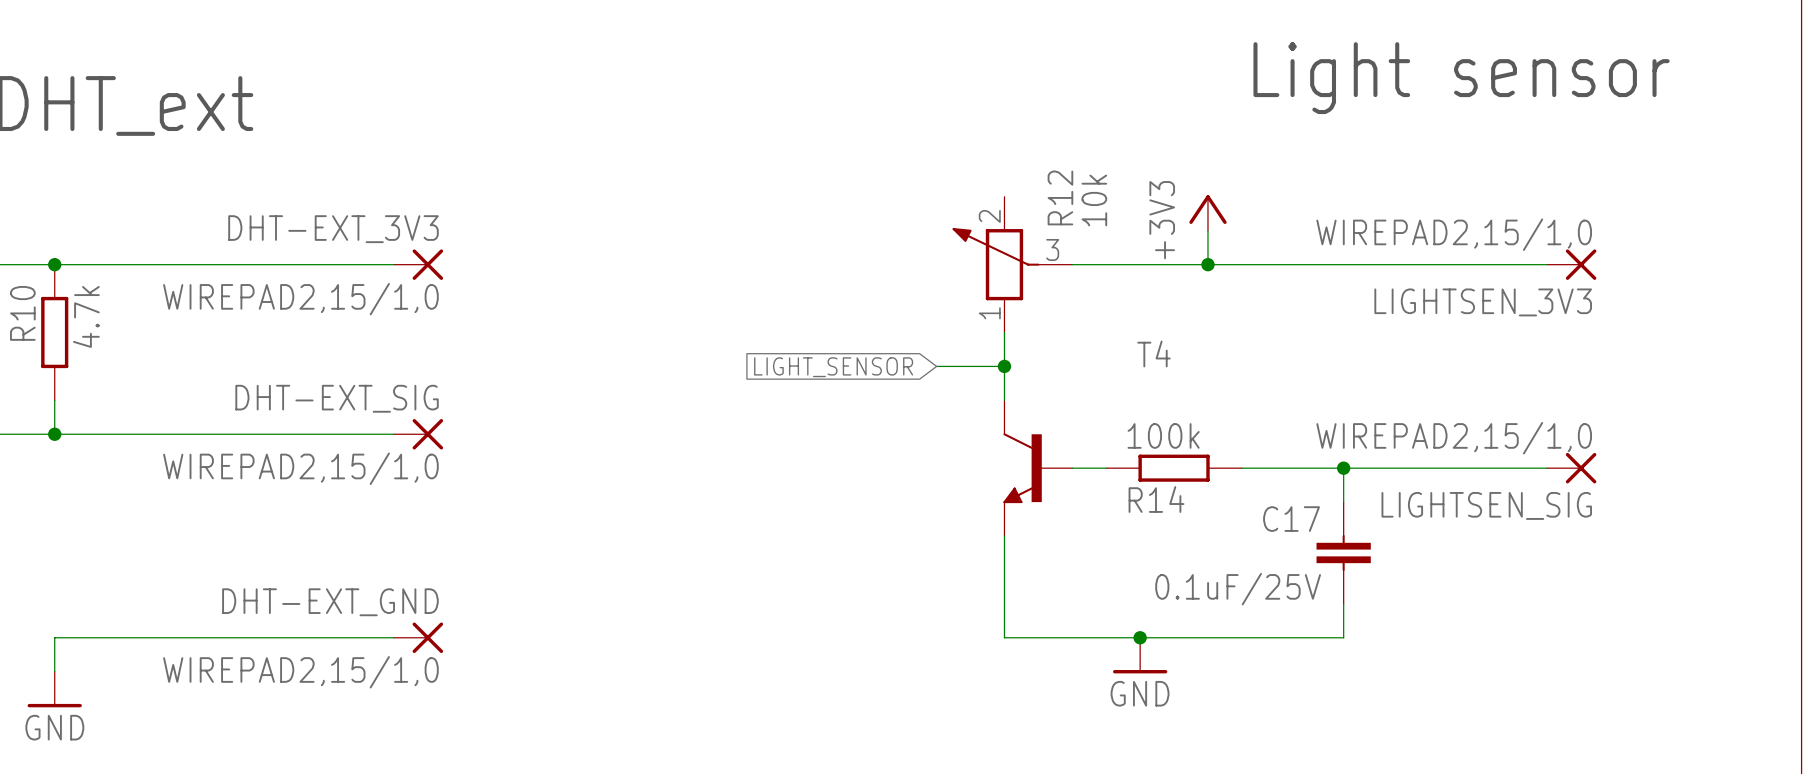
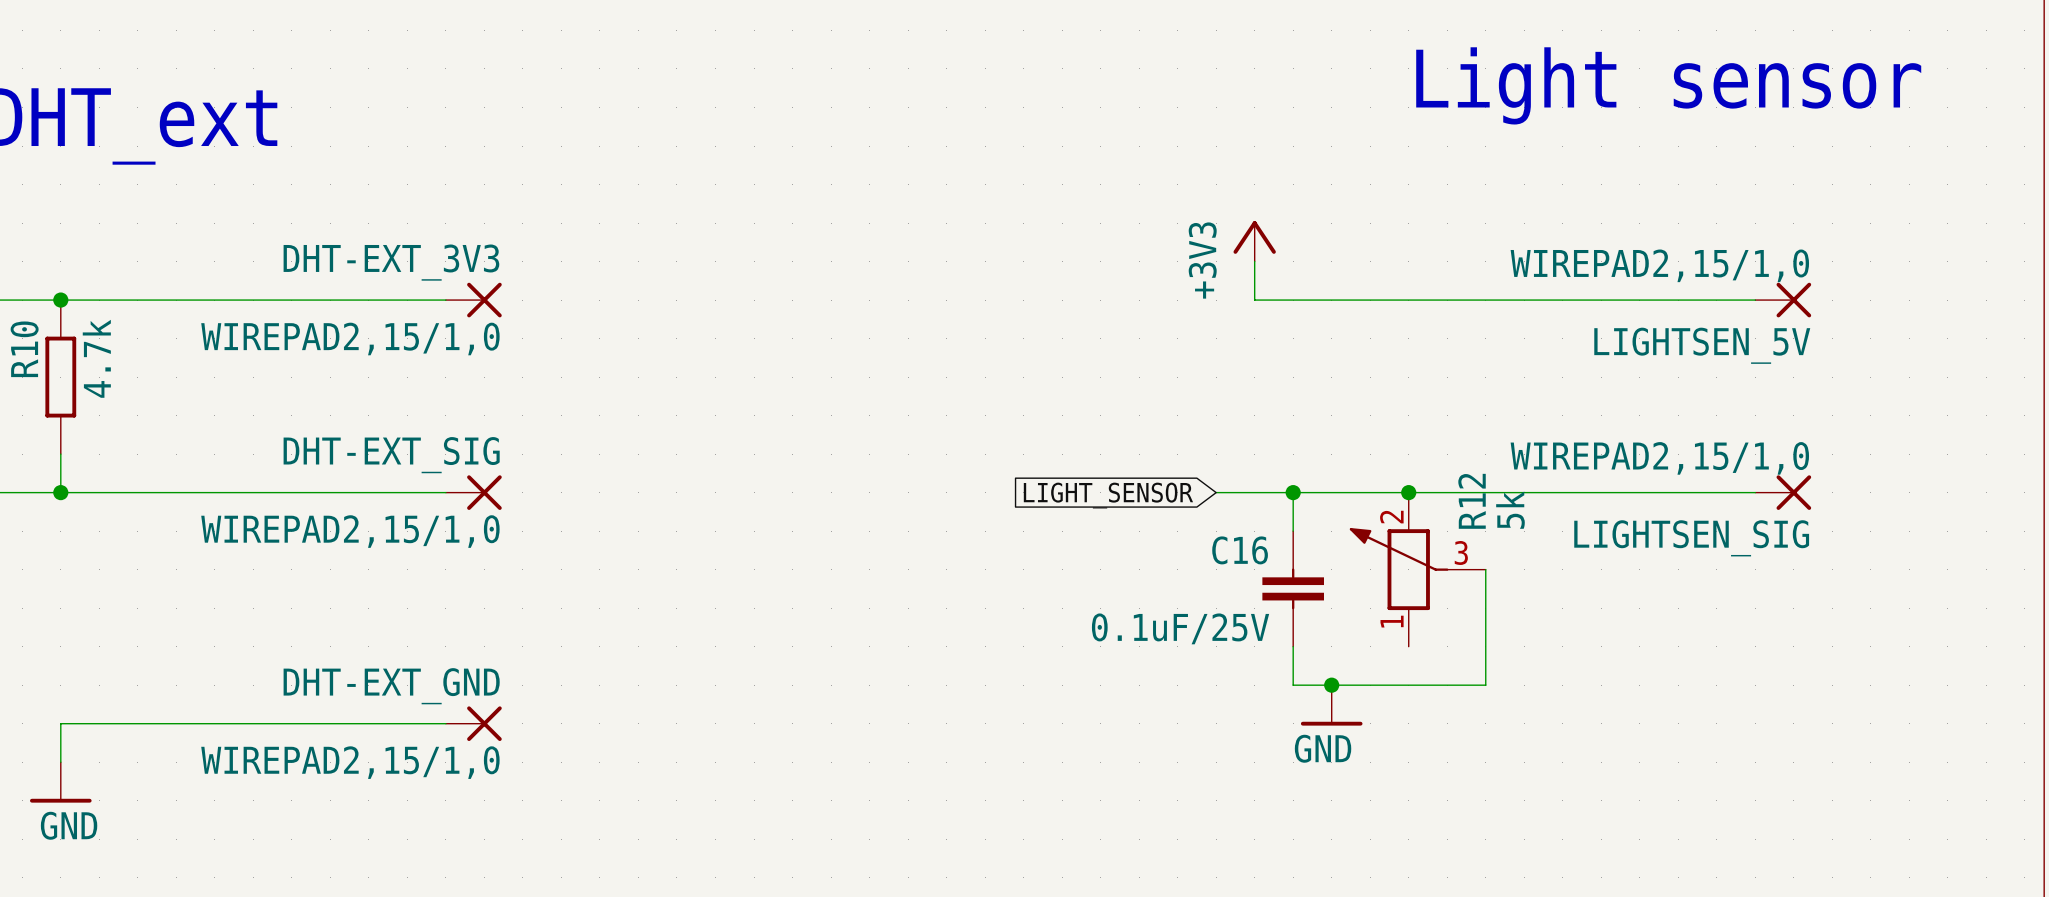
R12 value: 10k (1094, 200) -> 5k (1510, 510)
power symbol position: +3V3 (1207, 212) -> +3V3 (1254, 241)
wire: (1207, 230) (1207, 264) -> none
R12 position: (1012, 264) -> (1417, 569)
wire: (1072, 264) (1106, 264) -> (1254, 261) (1254, 300)
junction: (1207, 264) -> none
LIGHTSEN_3V3 name: LIGHTSEN_3V3 (1483, 302) -> LIGHTSEN_5V (1702, 345)
wire: (1004, 332) (1004, 400) -> none
wire: (936, 366) (1004, 366) -> none
junction: (1004, 366) -> none
global label position: LIGHT_SENSOR (833, 367) -> LIGHT_SENSOR (1108, 495)
wire: none -> (1216, 492) (1755, 492)
junction: none -> (1293, 492)
junction: none -> (1408, 492)
T4: (1037, 468) -> none
wire: (1072, 468) (1106, 468) -> none
R14: 100k (1174, 468) -> none
wire: (1241, 468) (1547, 468) -> none
wire: (1343, 468) (1343, 502) -> (1293, 492) (1293, 531)
junction: (1343, 468) -> none
LIGHTSEN_SIG position: (1571, 468) -> (1783, 492)
wire: none -> (1485, 569) (1485, 685) (1293, 685) (1293, 646)
C16: none -> 0.1uF/25V (1293, 588)
wire: (1004, 536) (1004, 637) (1343, 637) (1343, 603) -> none
C17: 0.1uF/25V (1343, 552) -> none
junction position: (1140, 637) -> (1331, 685)
power symbol position: GND (1140, 655) -> GND (1331, 705)

